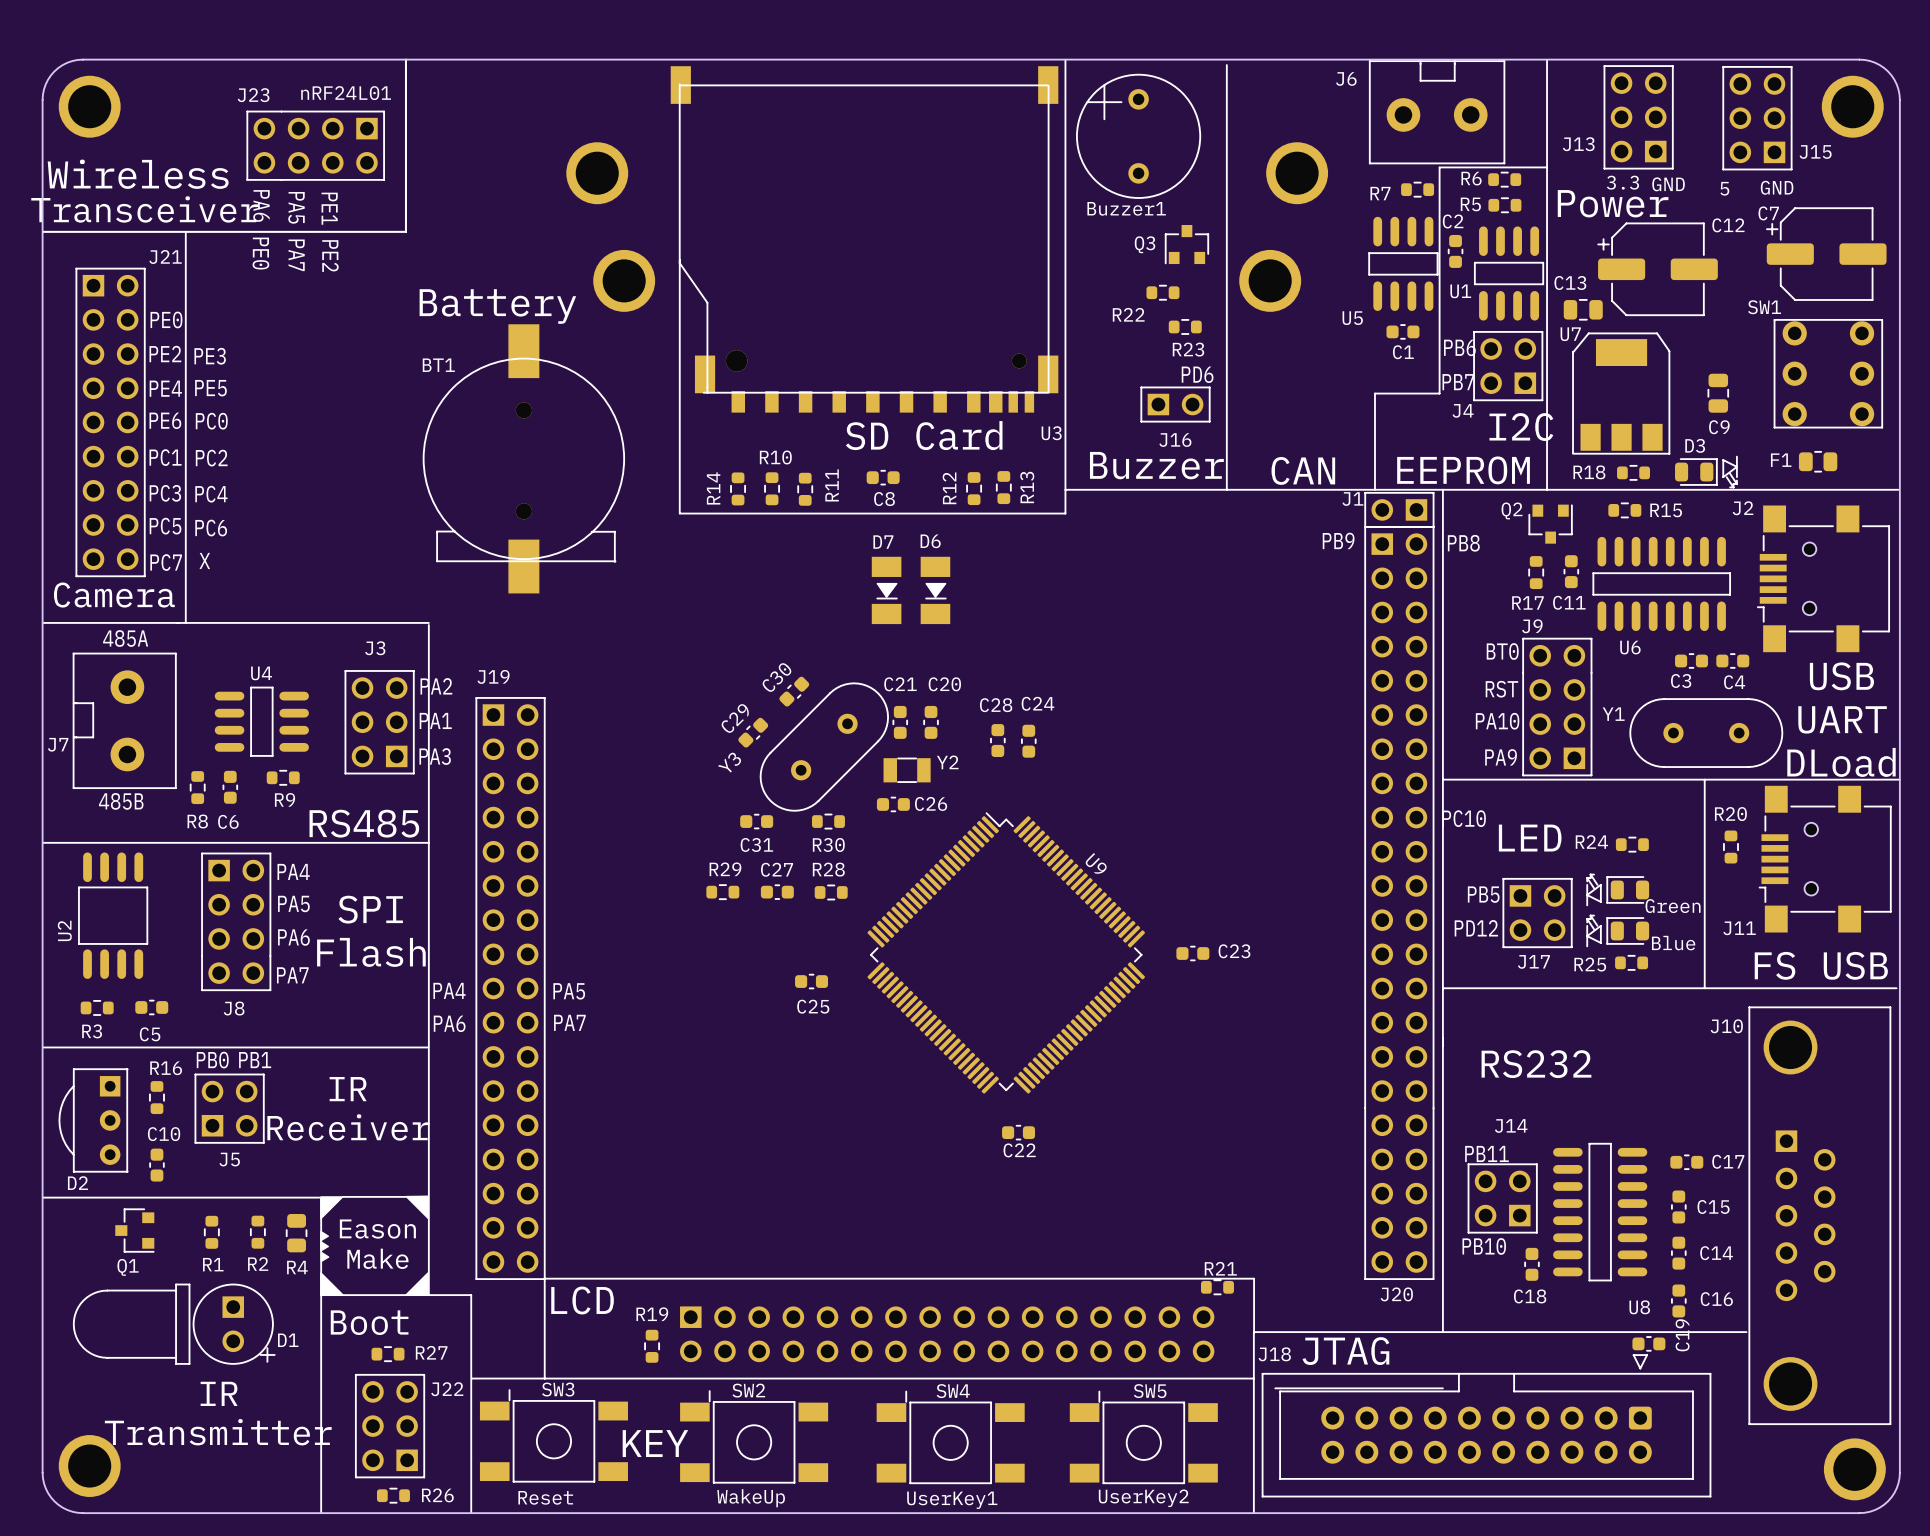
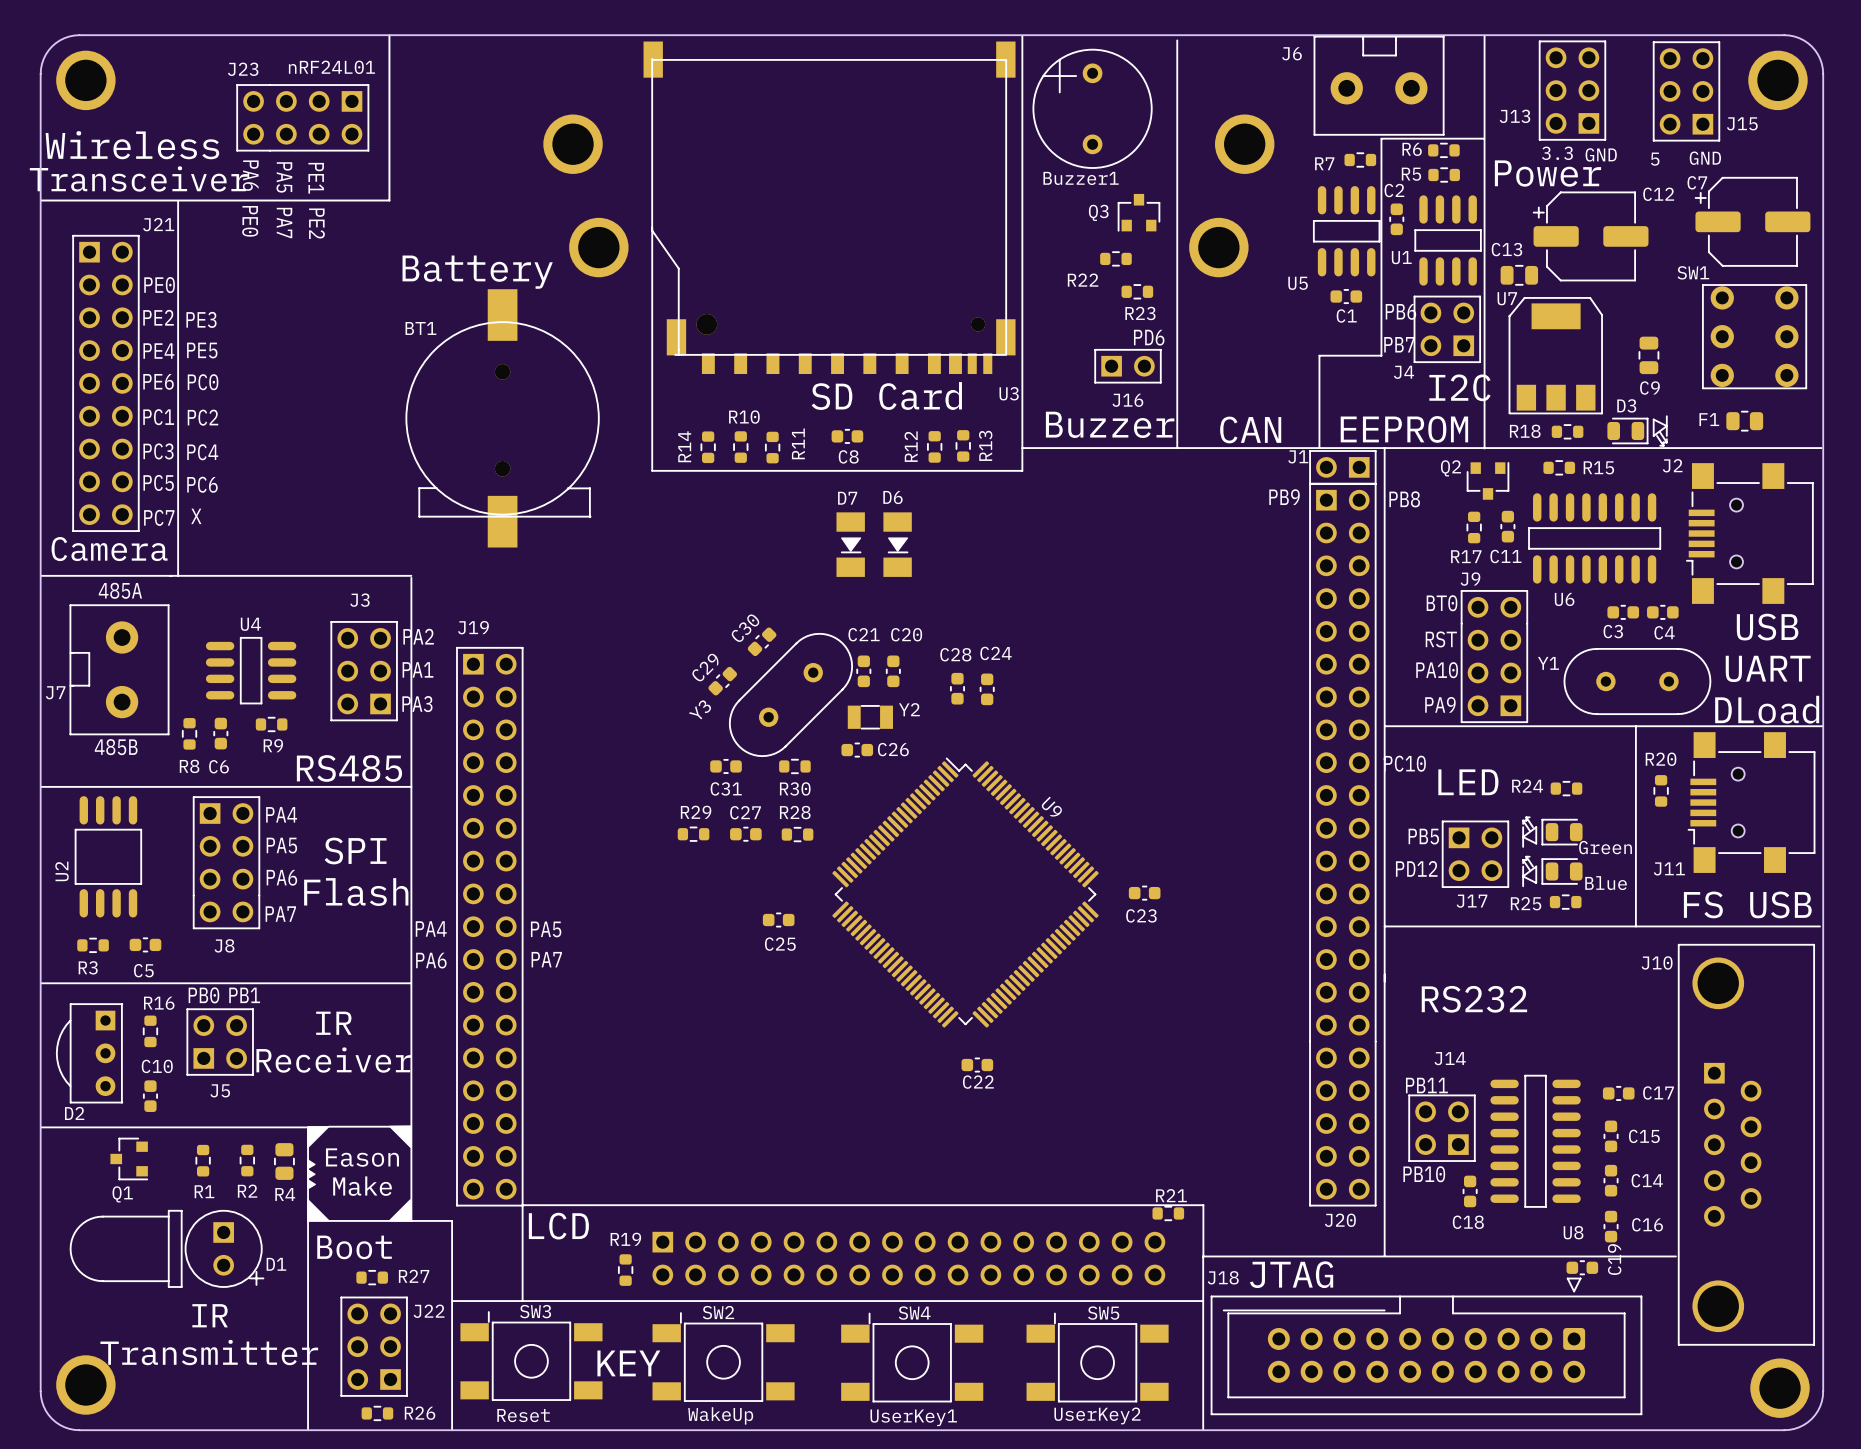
C23 name position: C23 (1234, 951) -> C23 (1141, 915)

